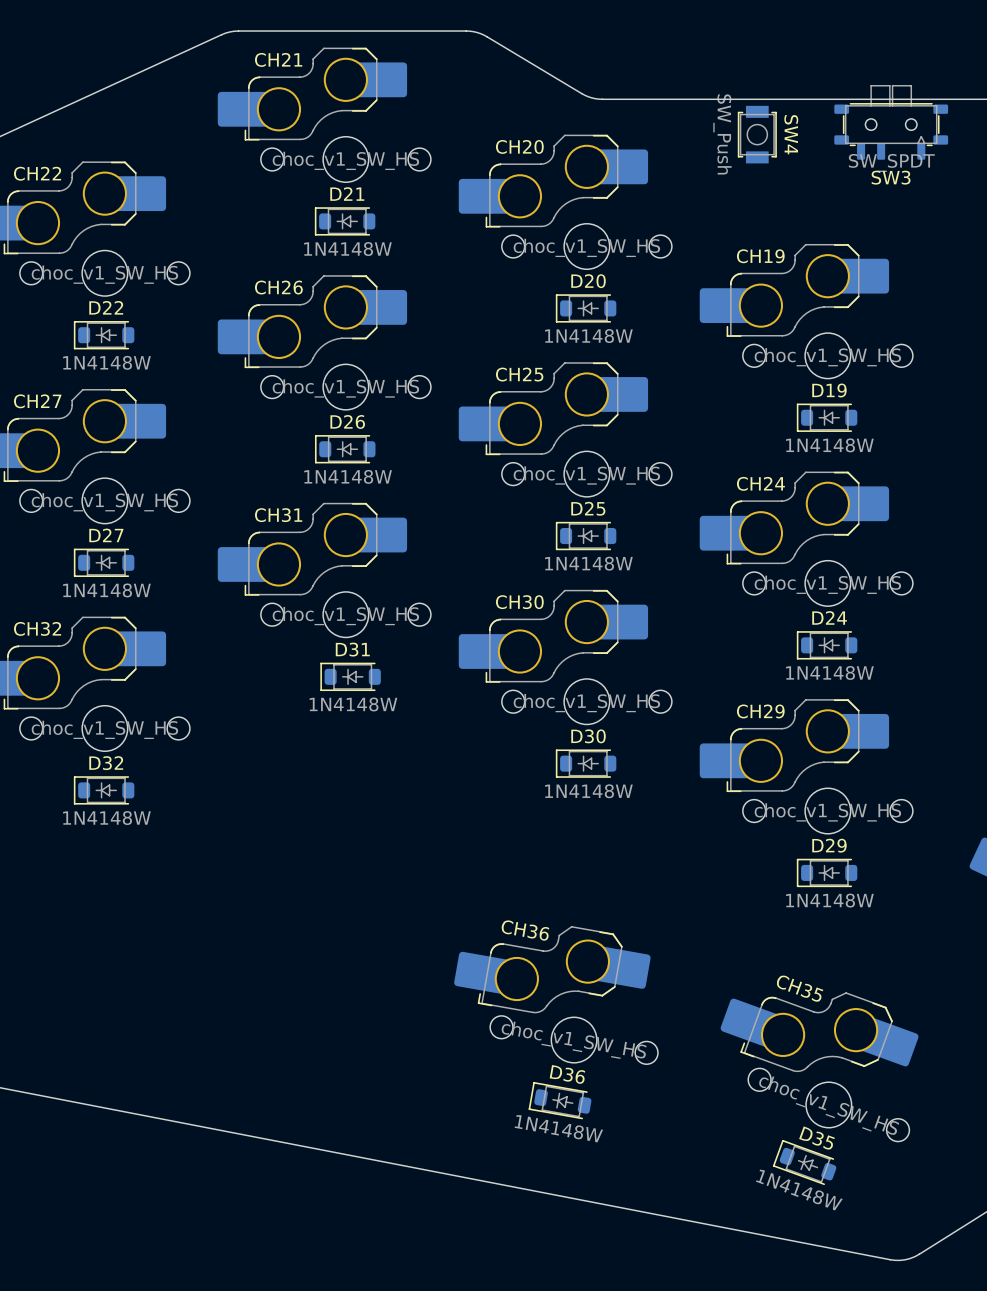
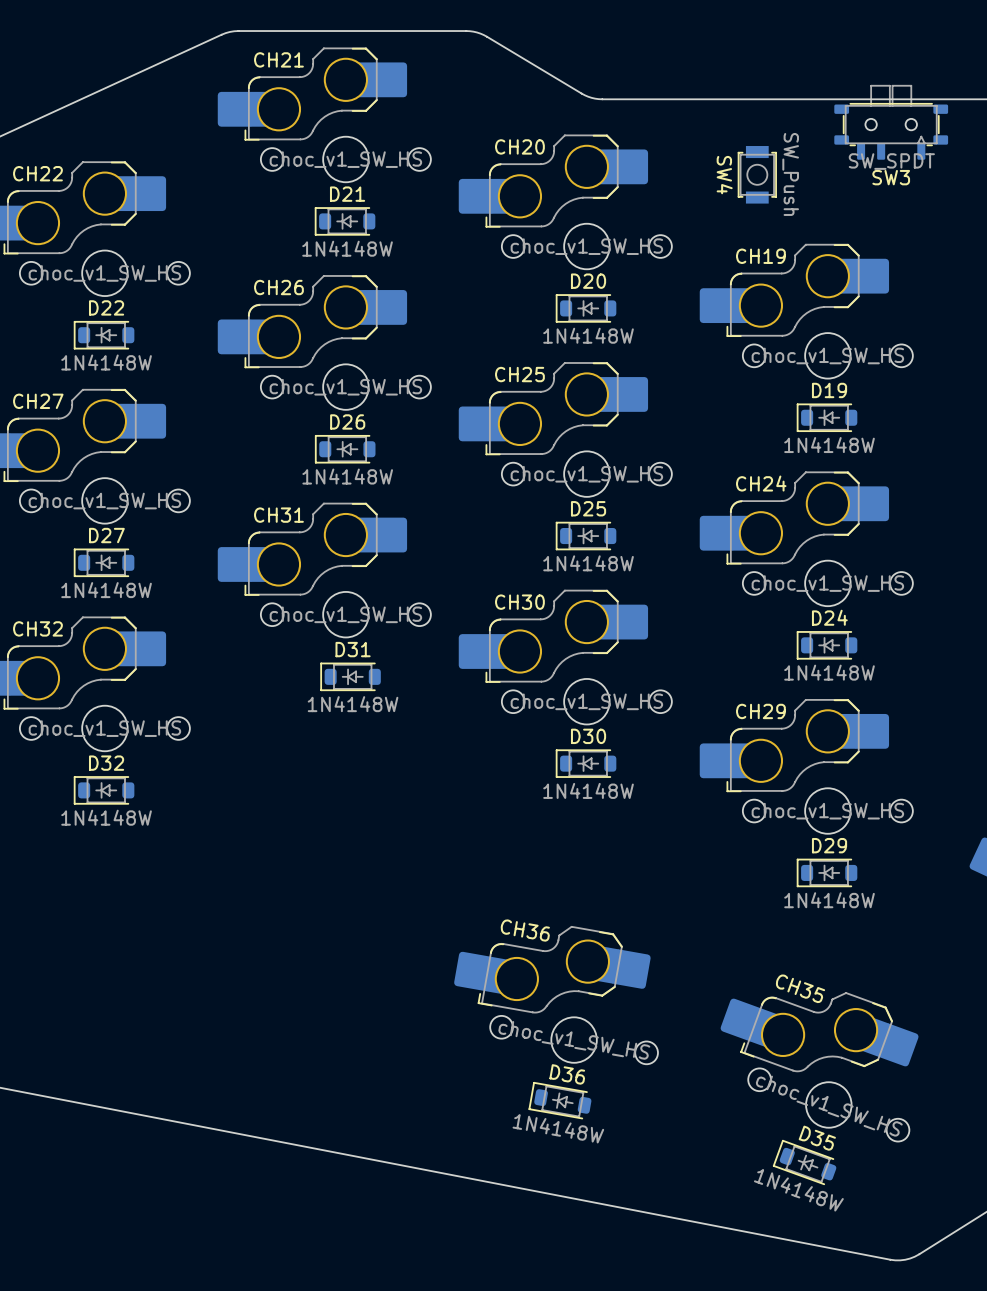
SW4 value position: SW_Push (722, 134) -> SW_Push (790, 174)
SW4 position: (757, 134) -> (757, 174)
SW4 name position: SW4 (791, 134) -> SW4 (724, 175)

